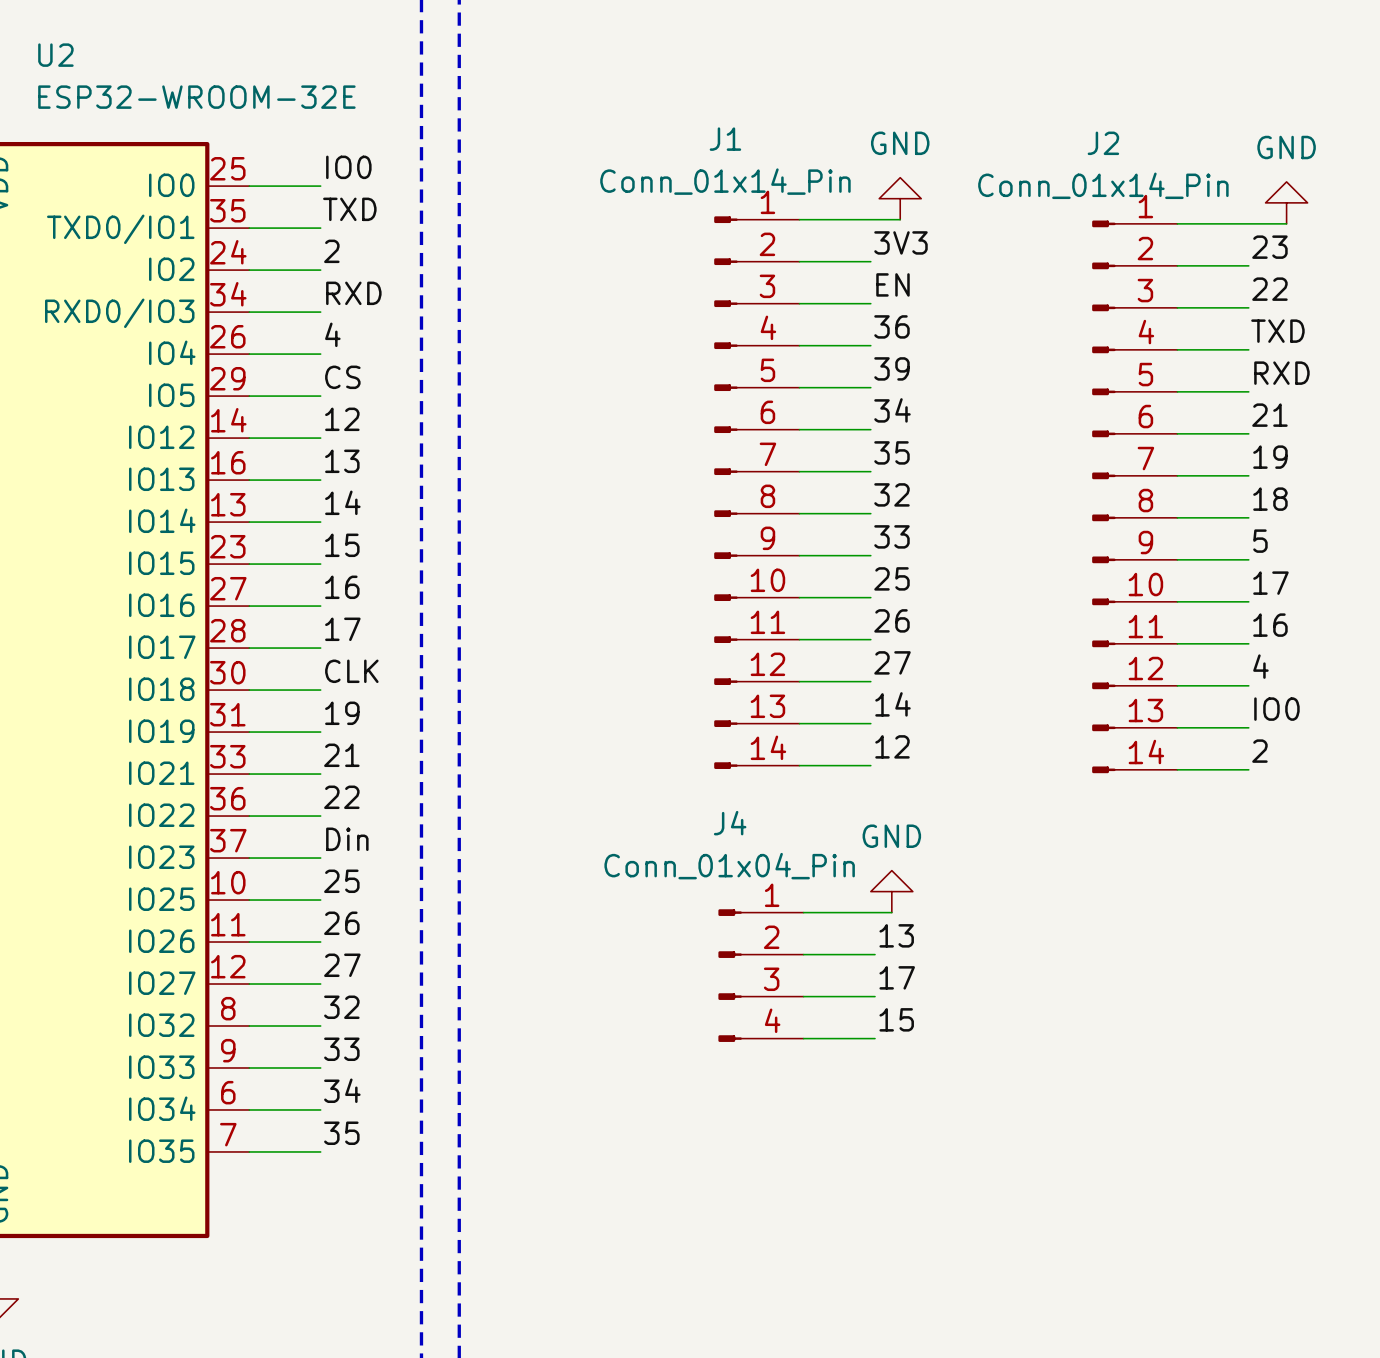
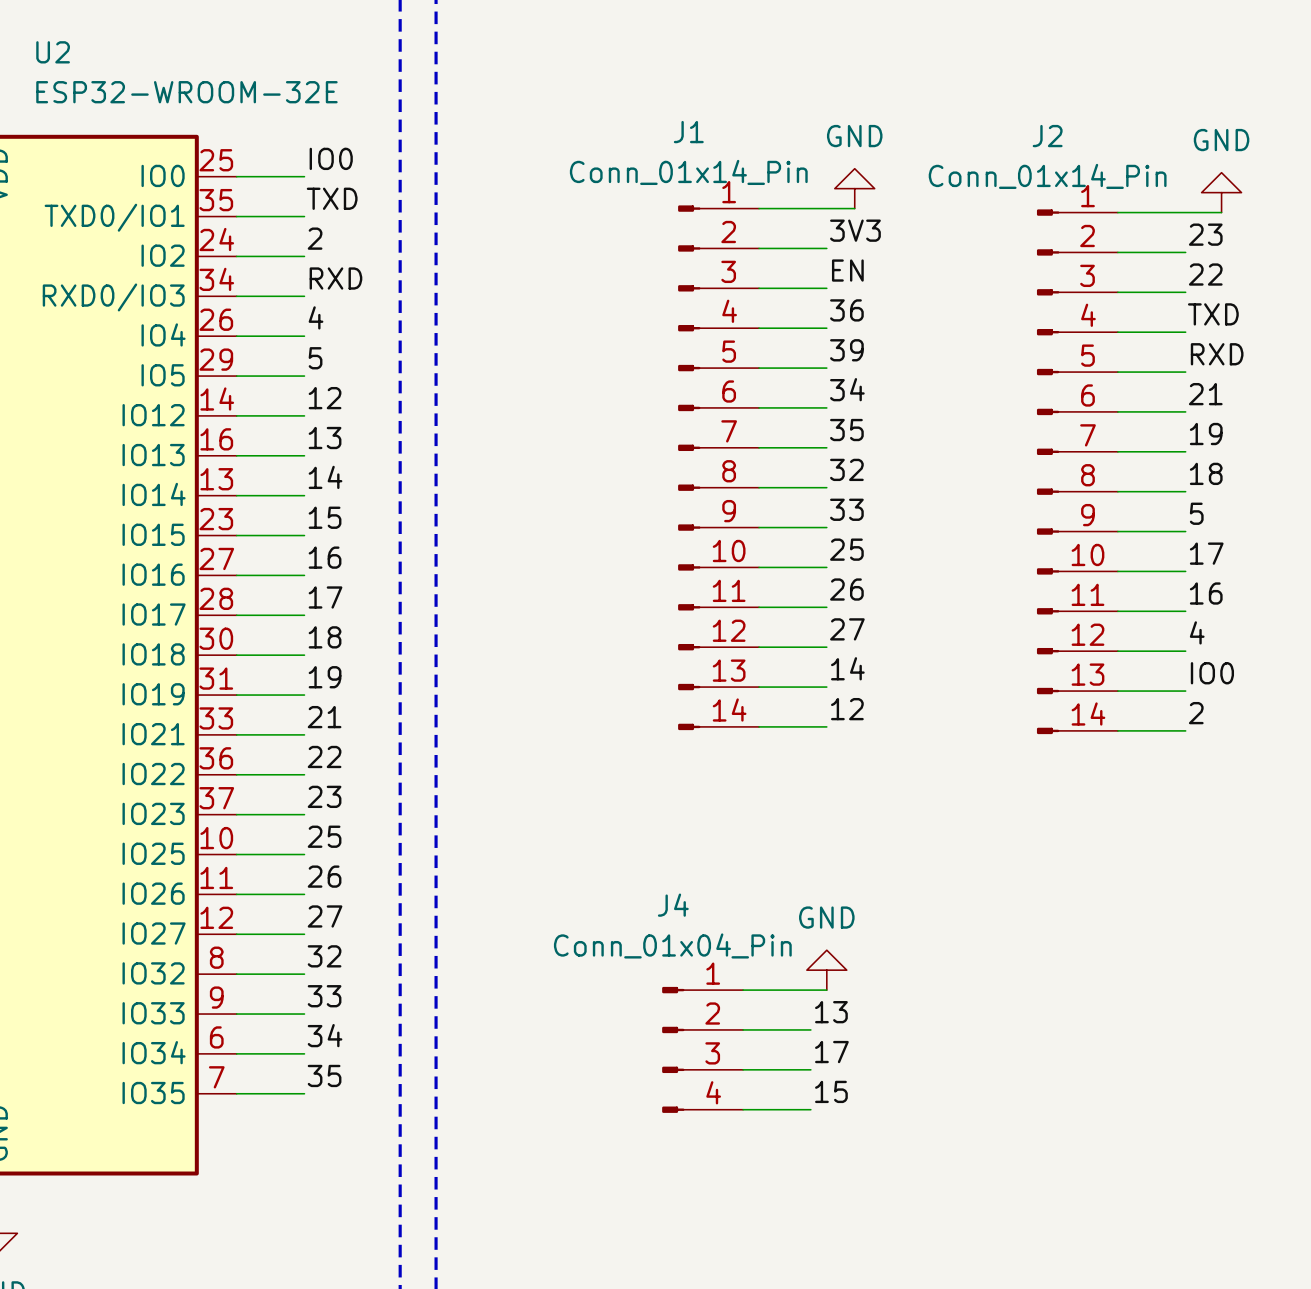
label: CS (342, 377) -> 5 (315, 358)
label: CLK (351, 671) -> 18 (325, 637)
label: Din (347, 839) -> 23 (324, 796)
power symbol position: GND (891, 891) -> GND (826, 970)
wire: (803, 912) (891, 912) -> (743, 990) (826, 990)
label position: 13 (896, 935) -> 13 (831, 1012)
wire: (803, 954) (875, 954) -> (743, 1109) (810, 1109)
J4 position: (761, 975) -> (702, 1049)
label position: 17 (897, 977) -> 17 (831, 1052)
wire: (803, 996) (875, 996) -> (743, 1069) (810, 1069)
label position: 15 (896, 1019) -> 15 (831, 1091)
wire: (803, 1038) (875, 1038) -> (743, 1029) (810, 1029)

